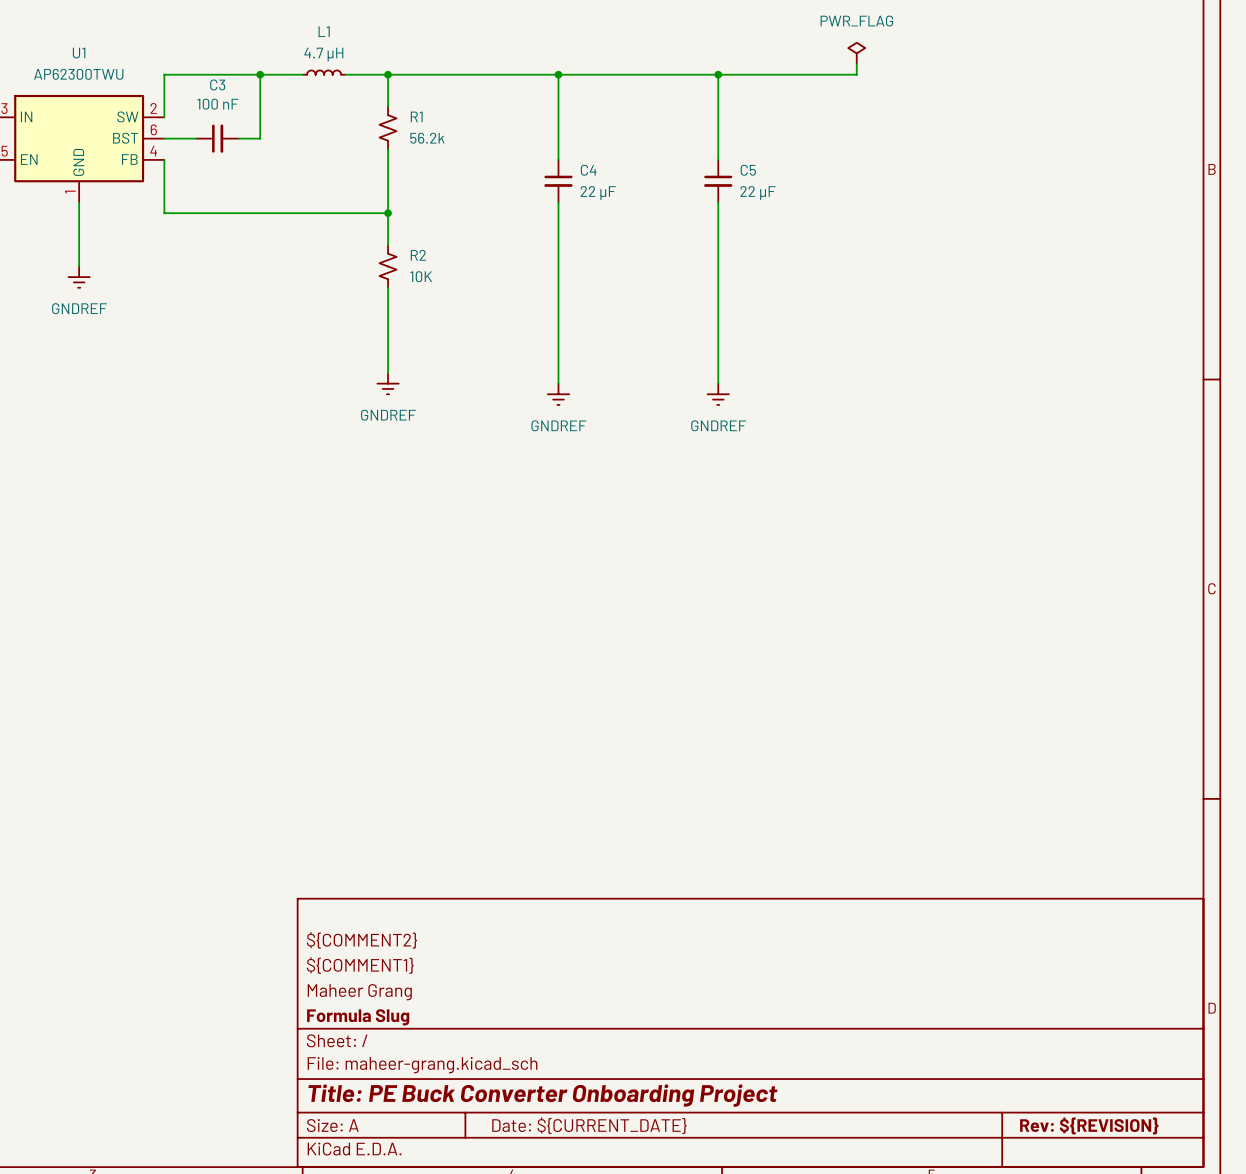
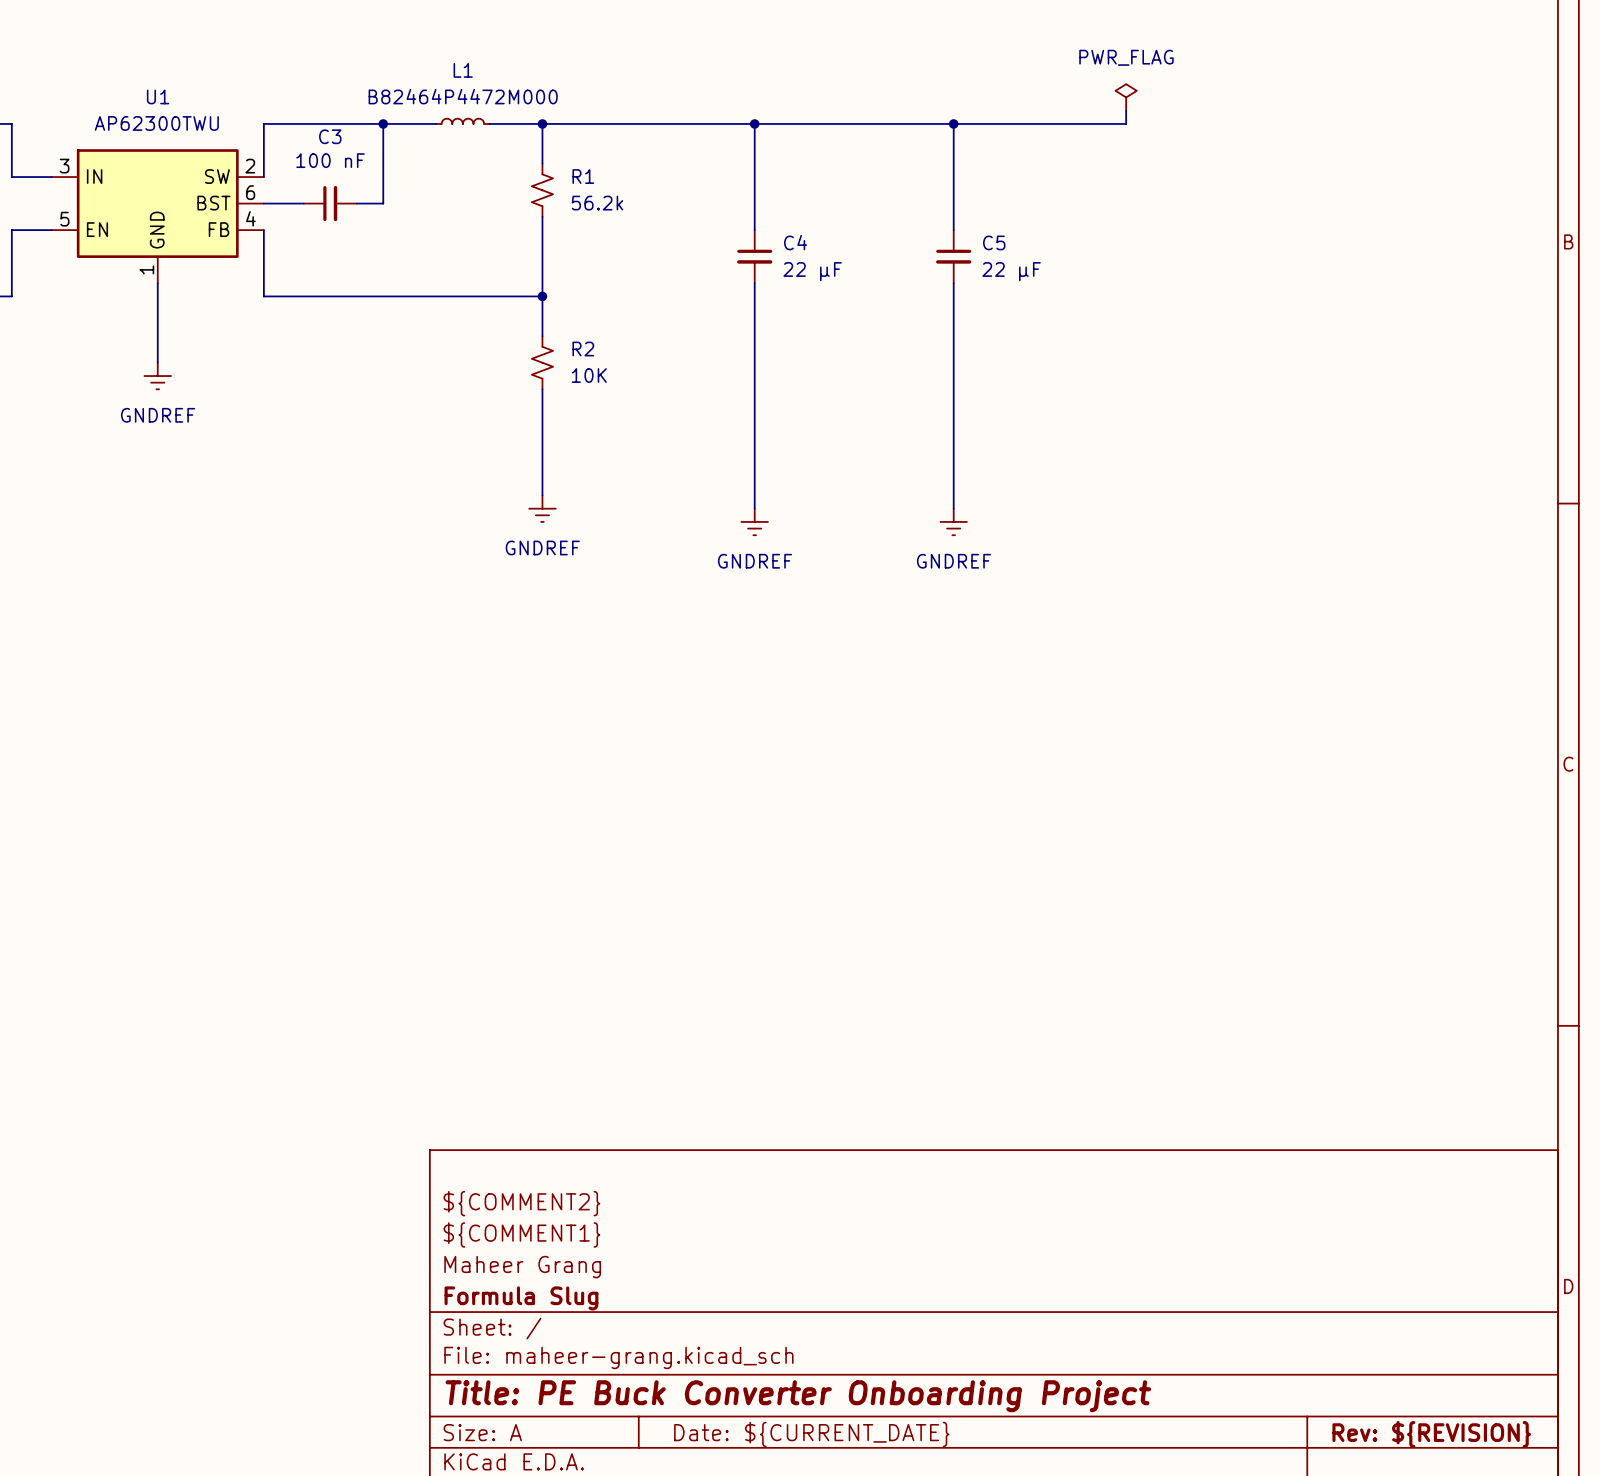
L1 value: 4.7 µH (323, 54) -> B82464P4472M000 (463, 96)

